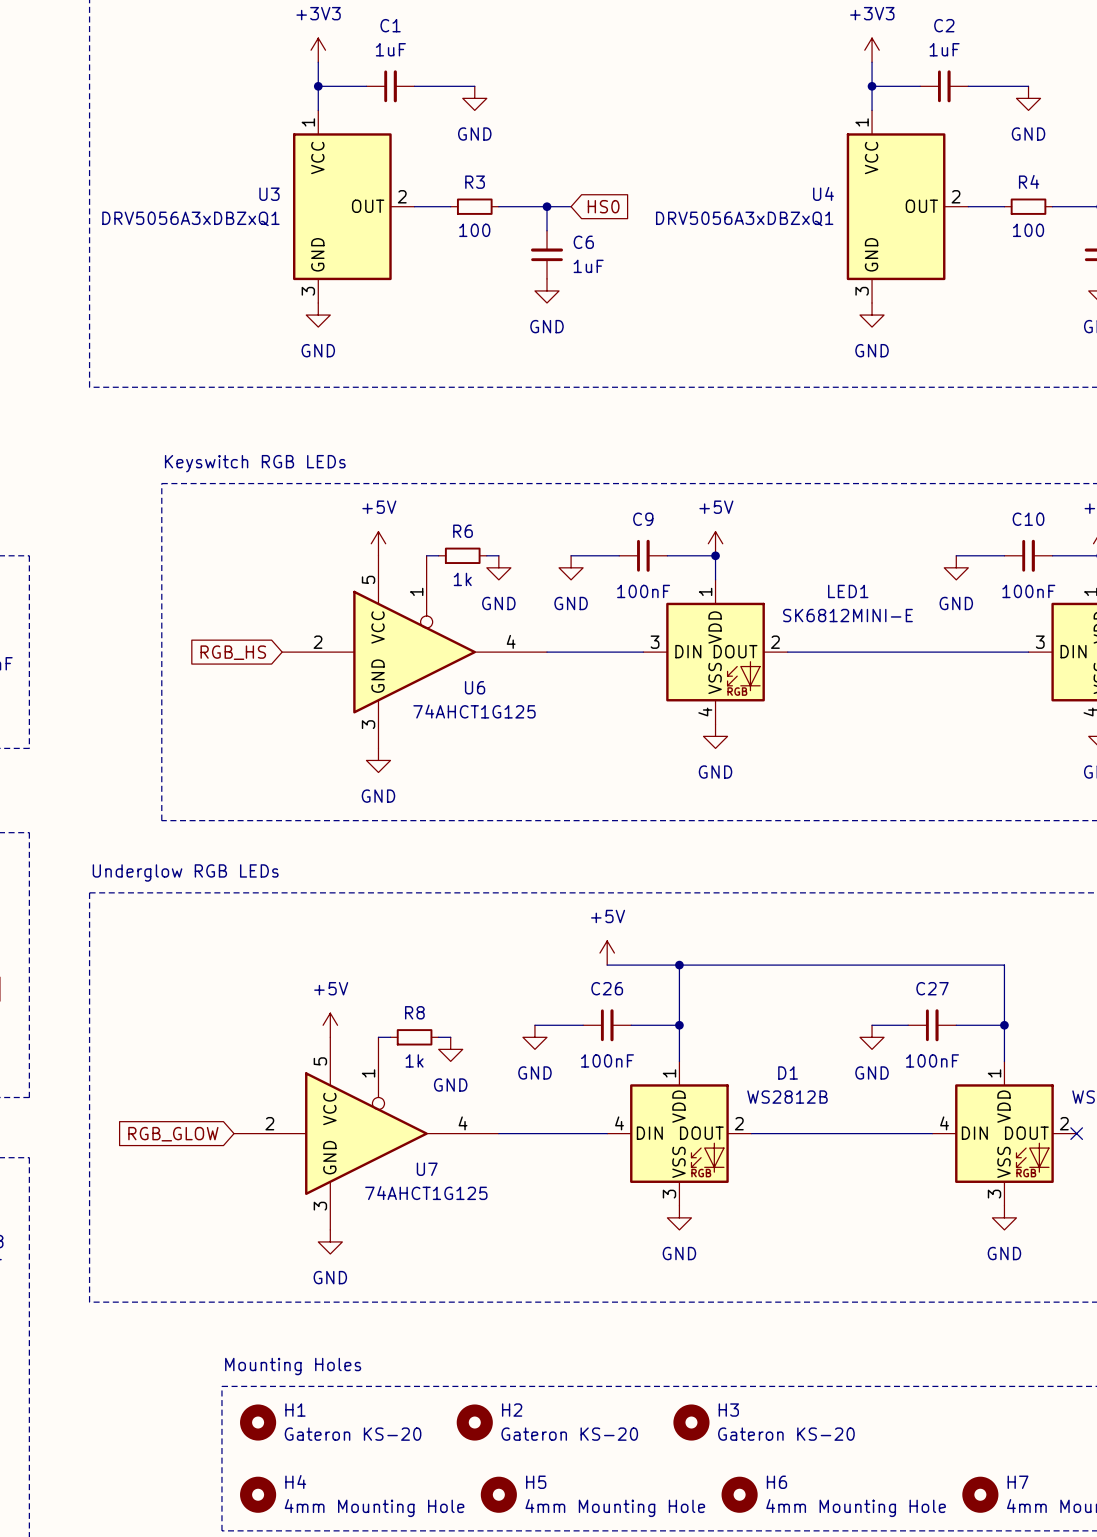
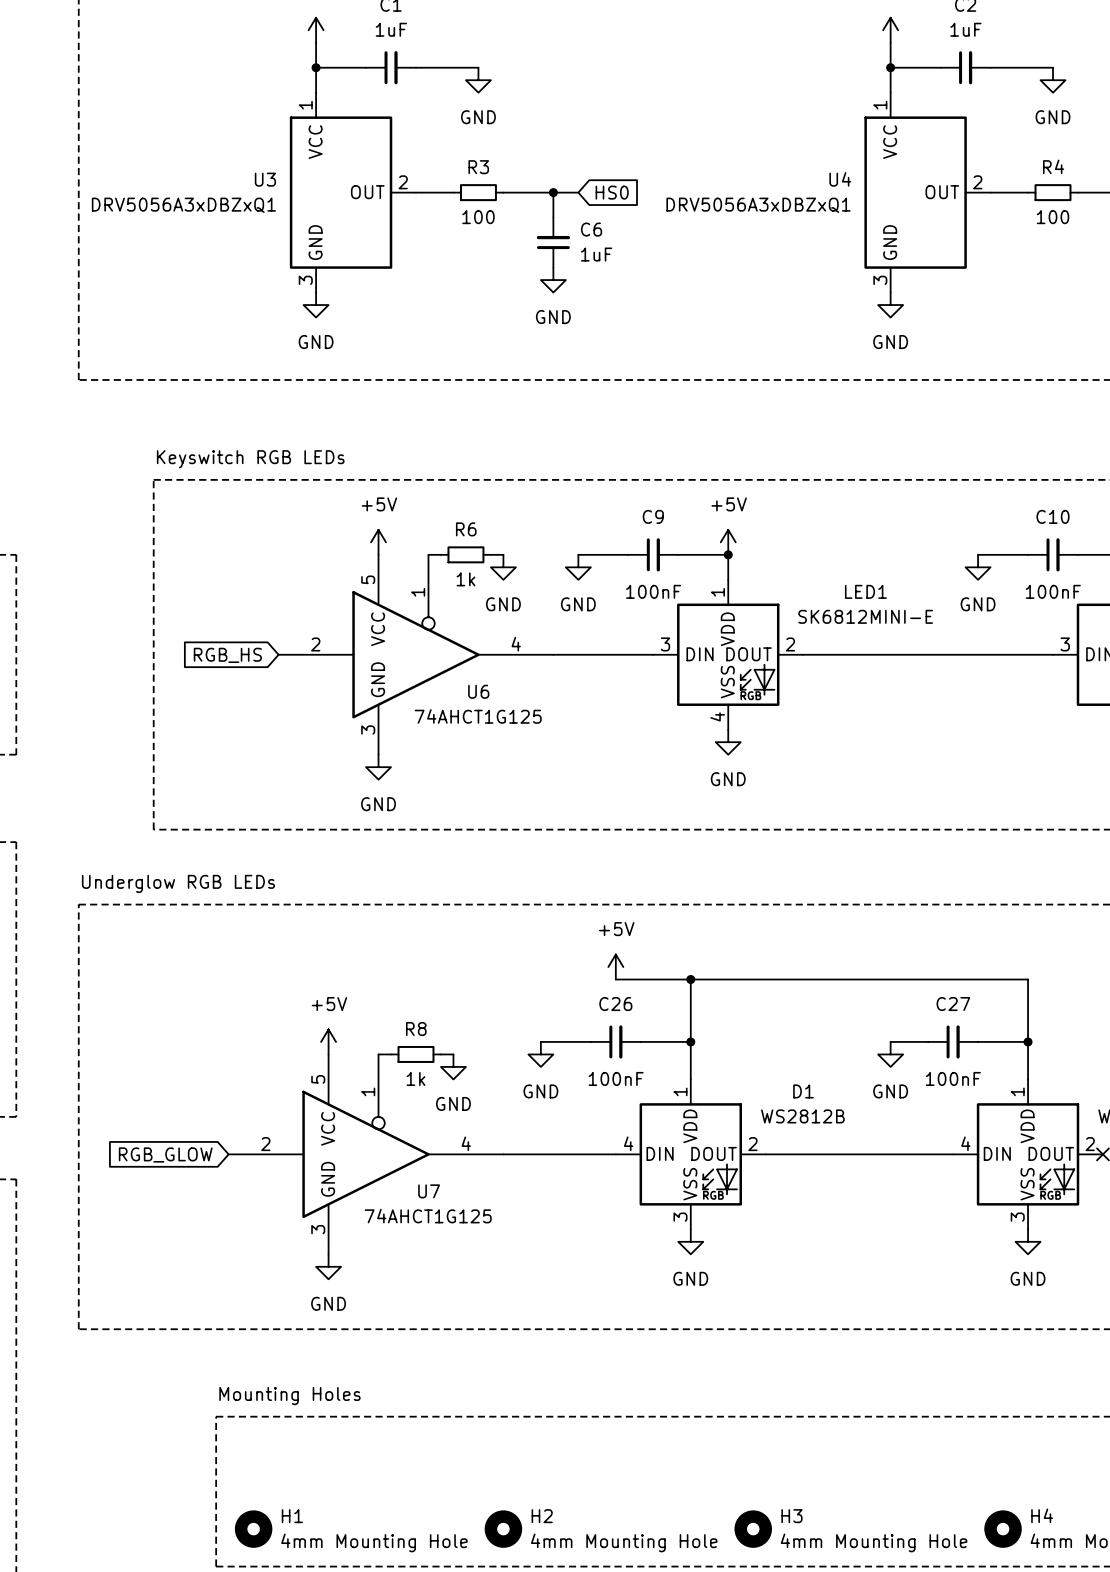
H1: Gateron KS-20 (258, 1422) -> none
H2: Gateron KS-20 (474, 1422) -> none
H3: Gateron KS-20 (691, 1422) -> none
H4 name: H4 (295, 1481) -> H1 (292, 1516)
H5 name: H5 (536, 1482) -> H2 (542, 1516)
H6 name: H6 (776, 1482) -> H3 (791, 1516)
H7 name: H7 (1018, 1482) -> H4 (1042, 1515)

